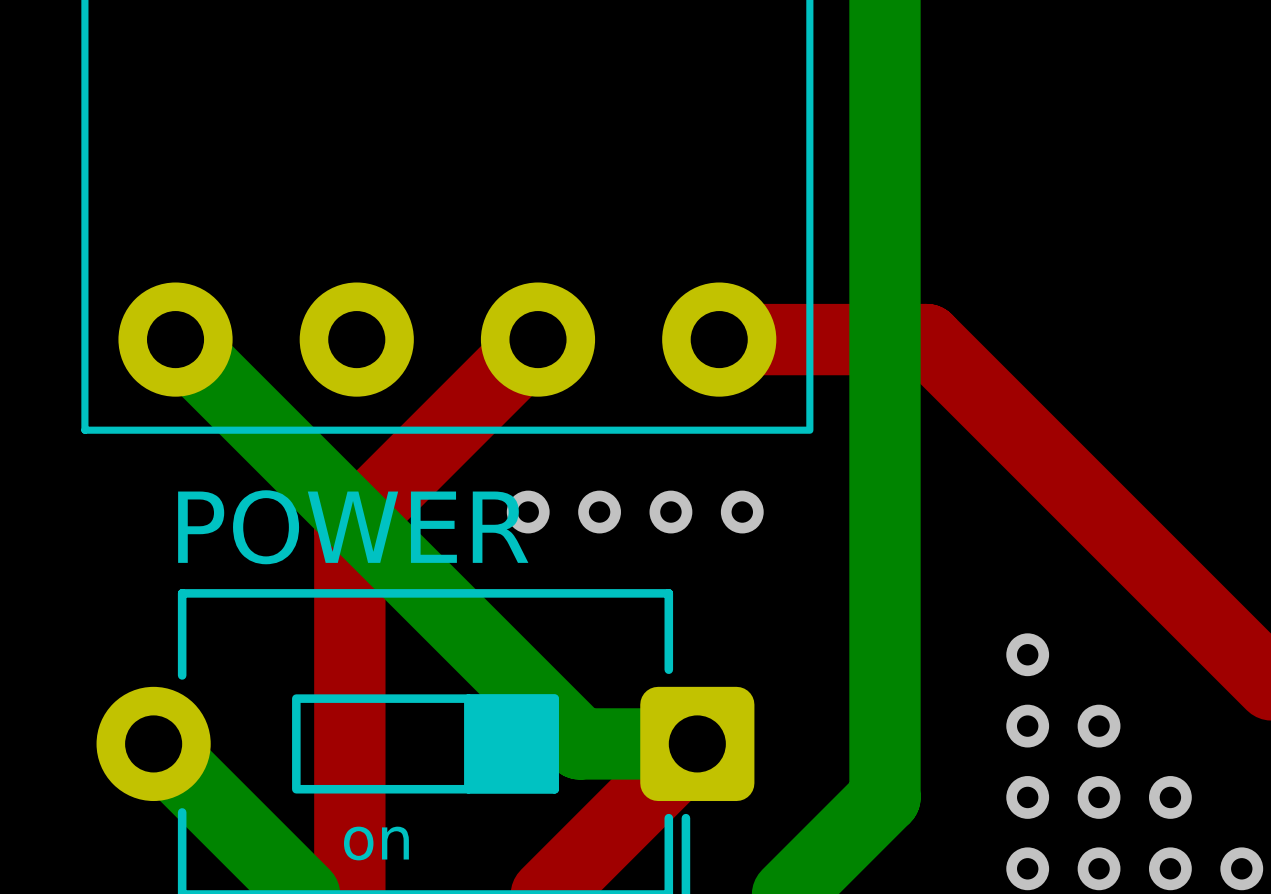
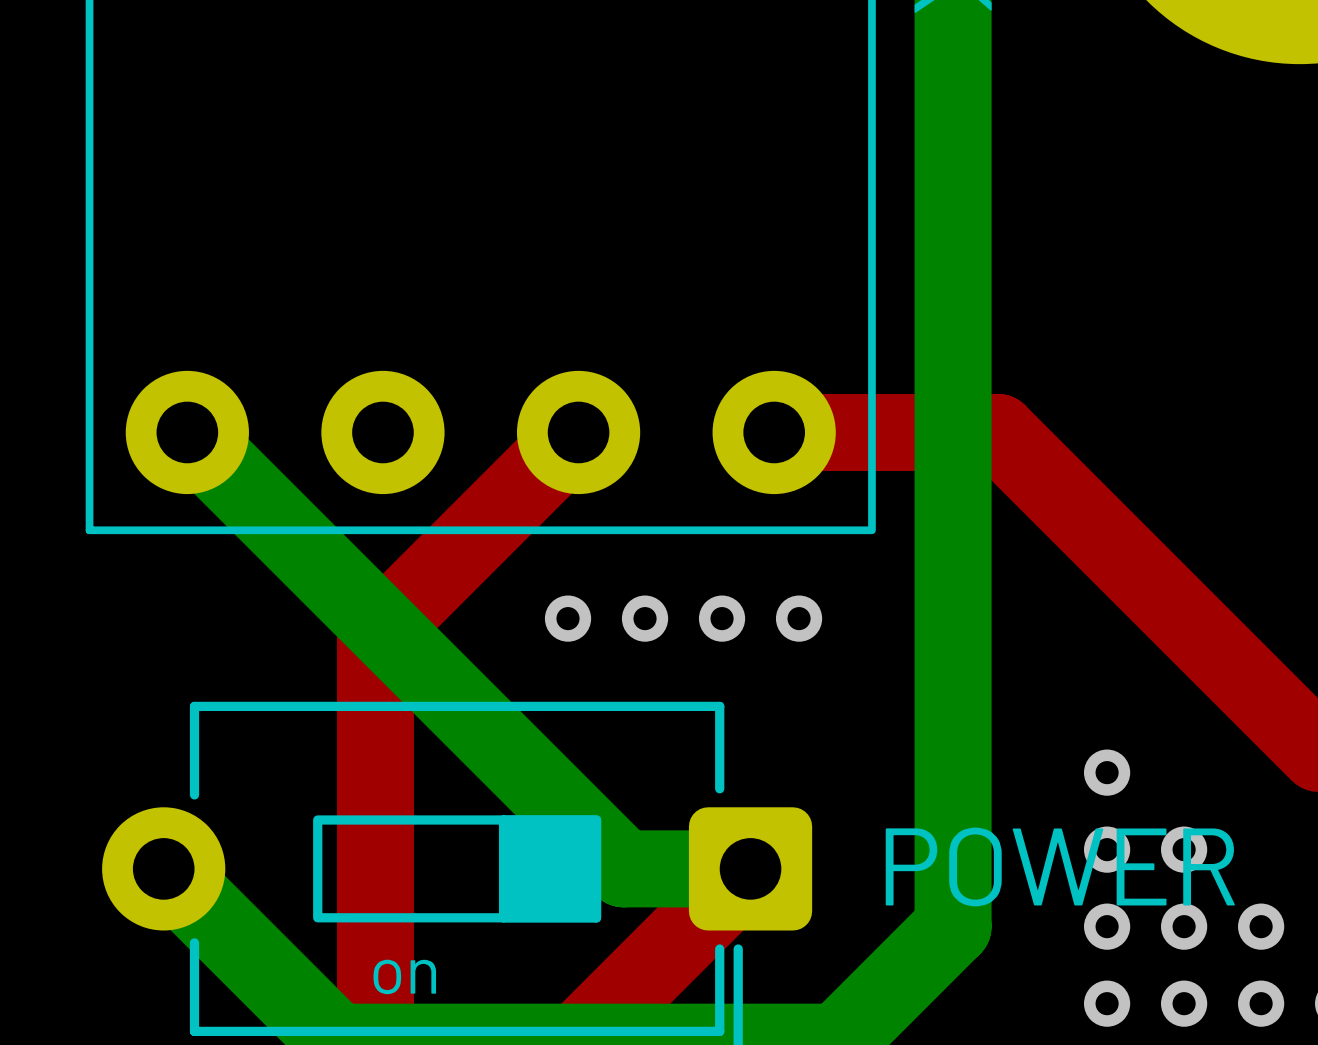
part value position: POWER (353, 527) -> POWER (1060, 866)

